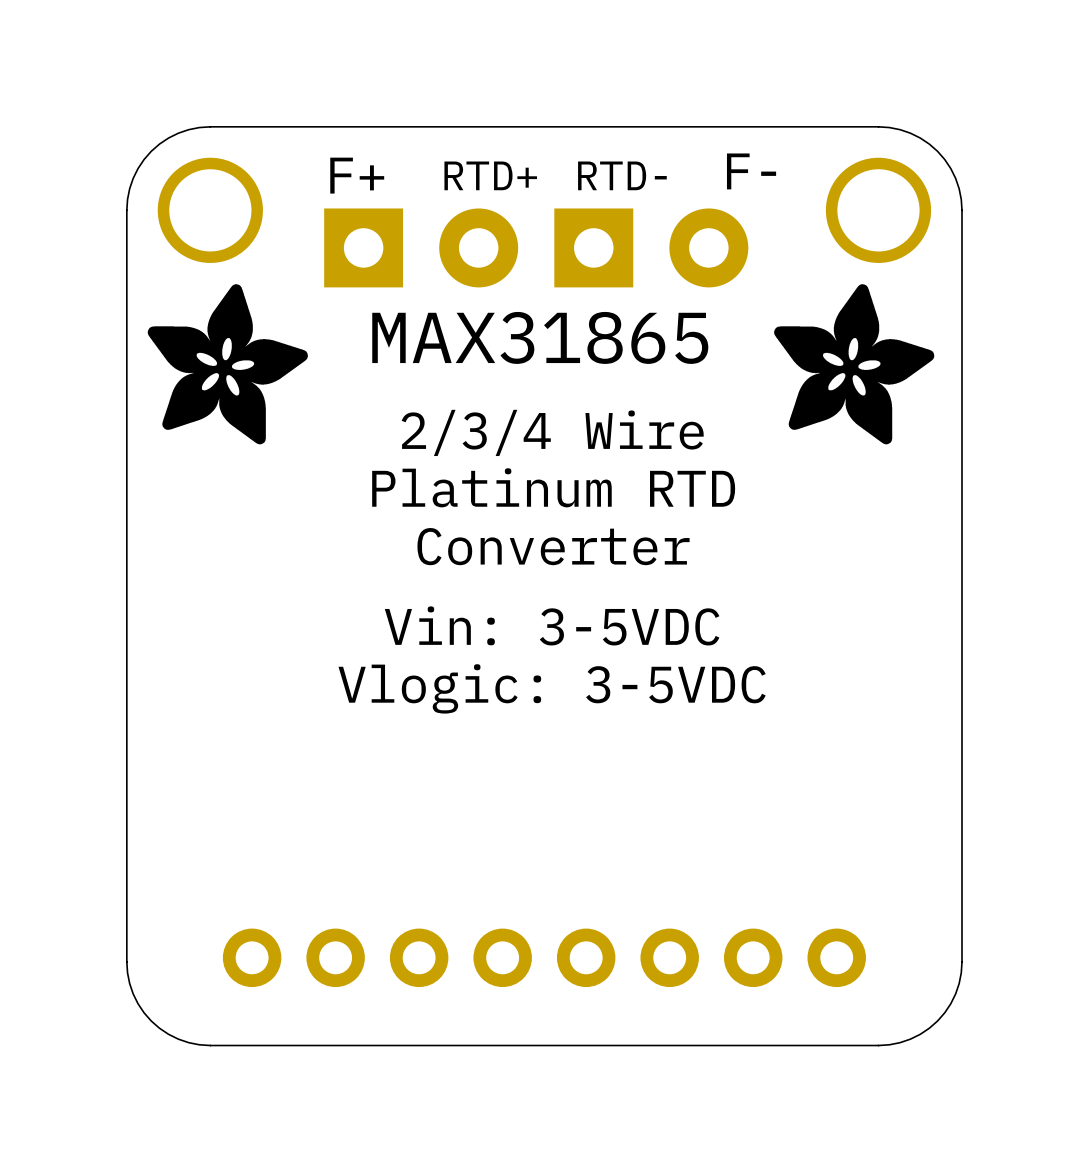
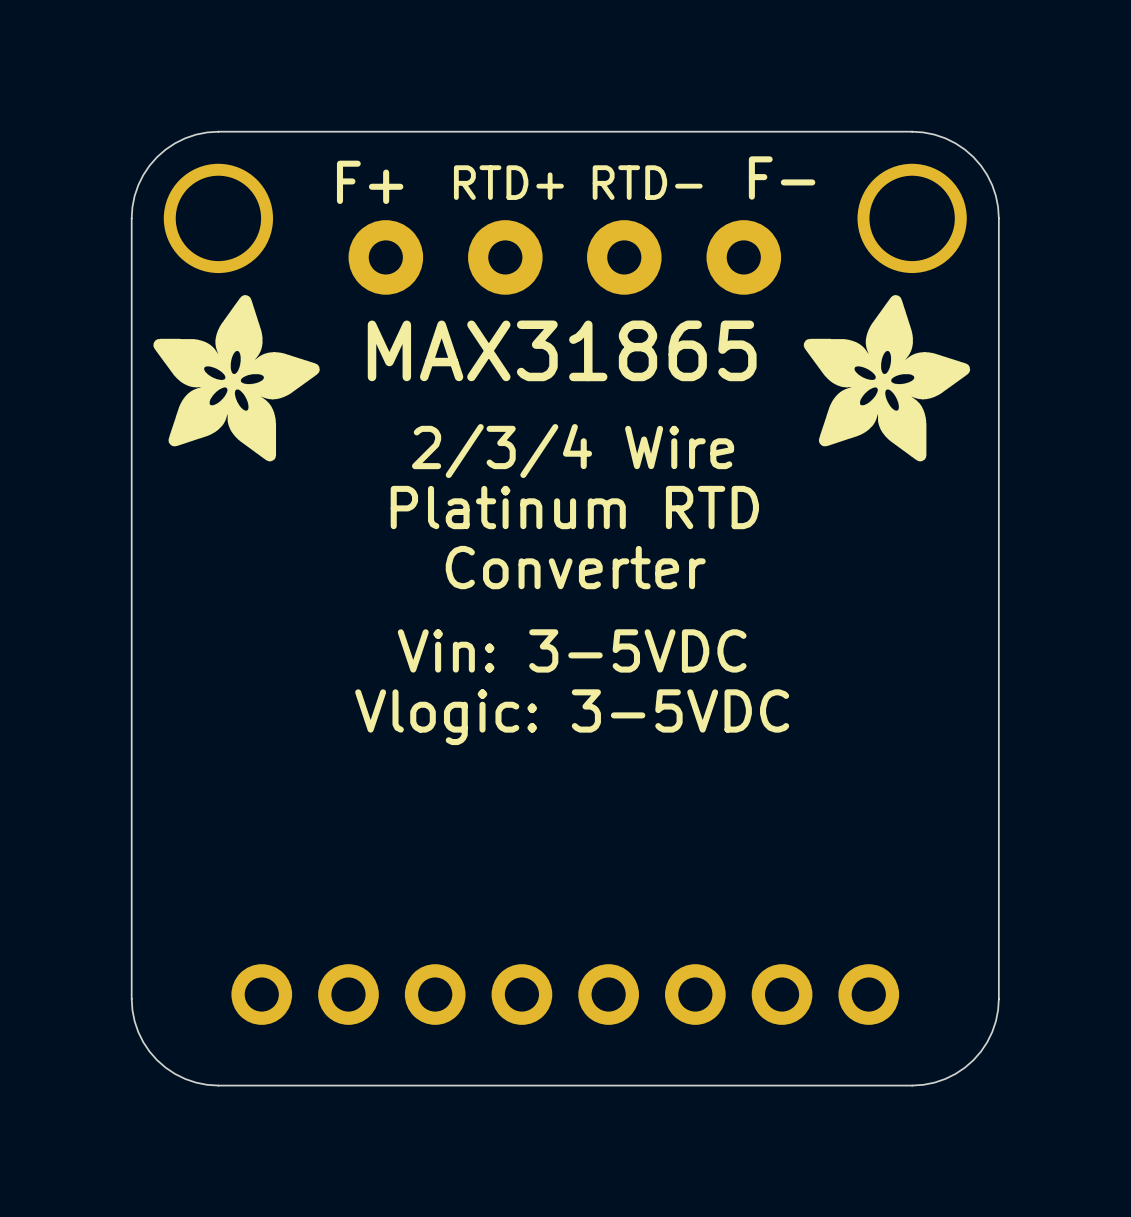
part footprint: [324, 208, 519, 288] -> [348, 220, 543, 295]
part footprint: [554, 208, 749, 288] -> [587, 220, 782, 295]

